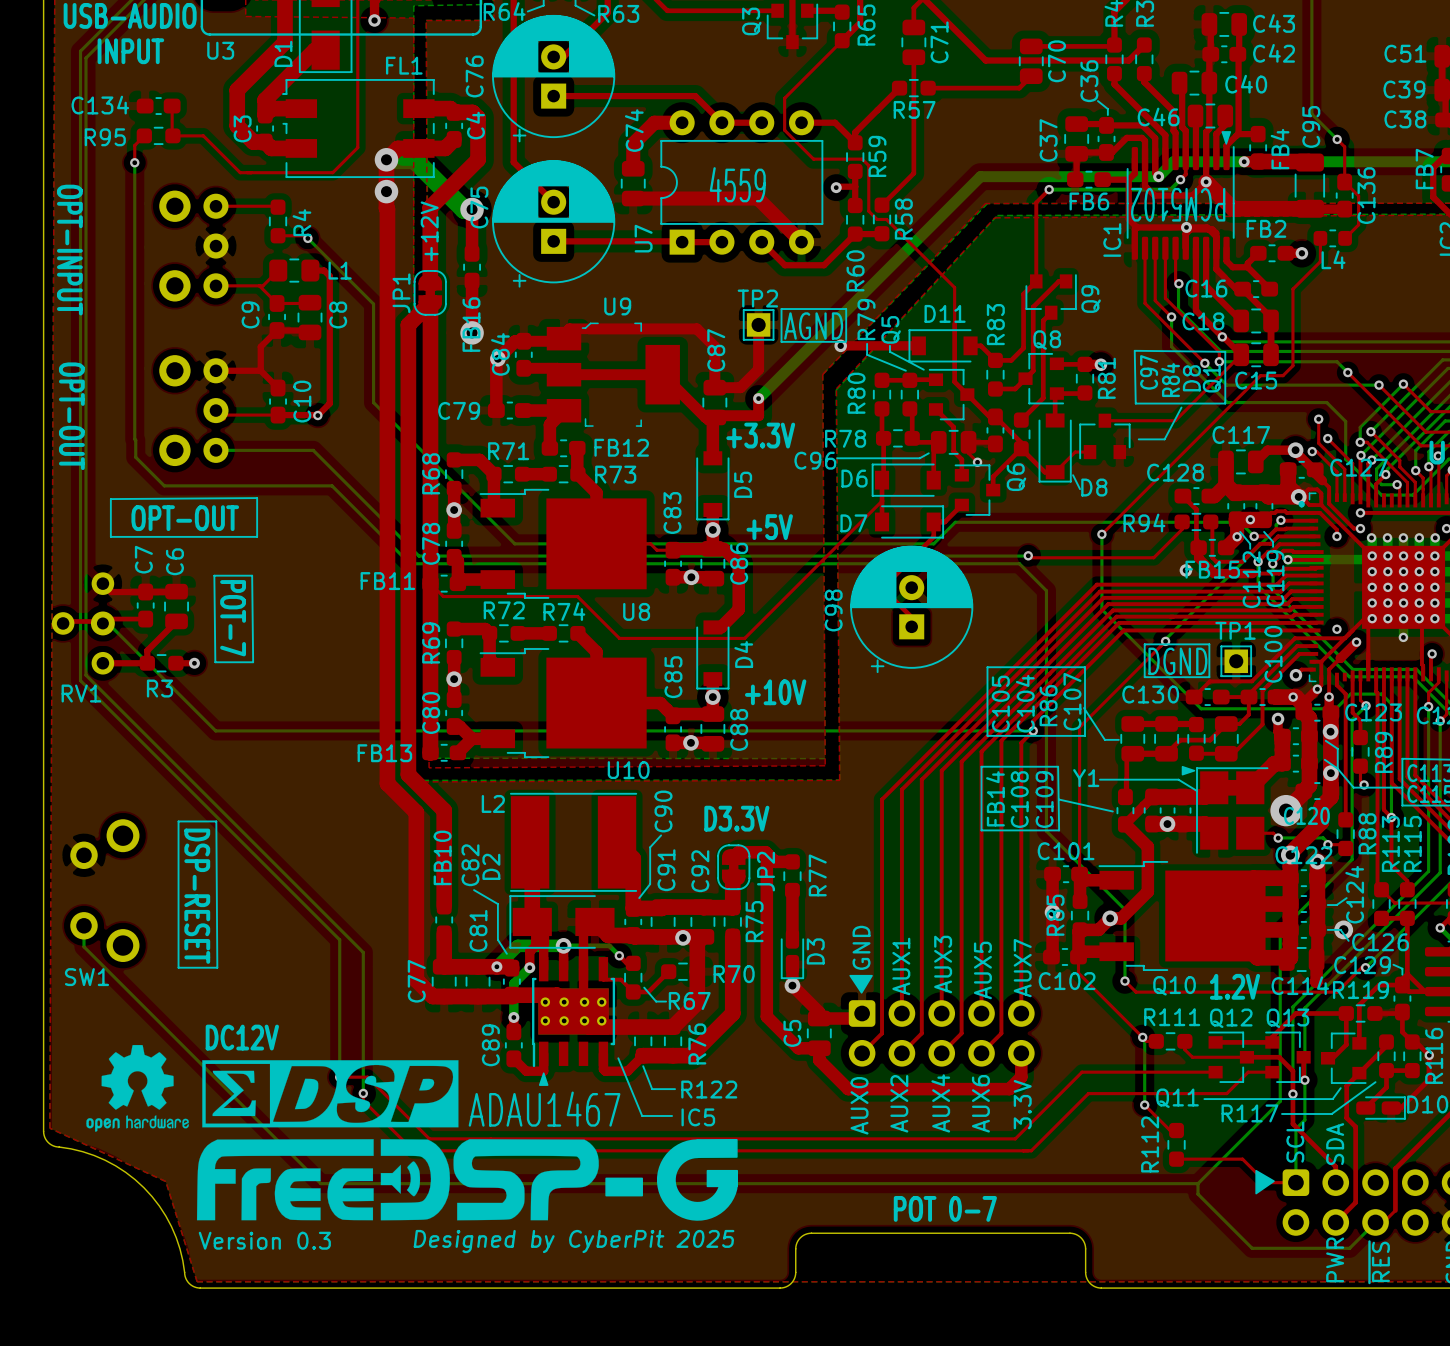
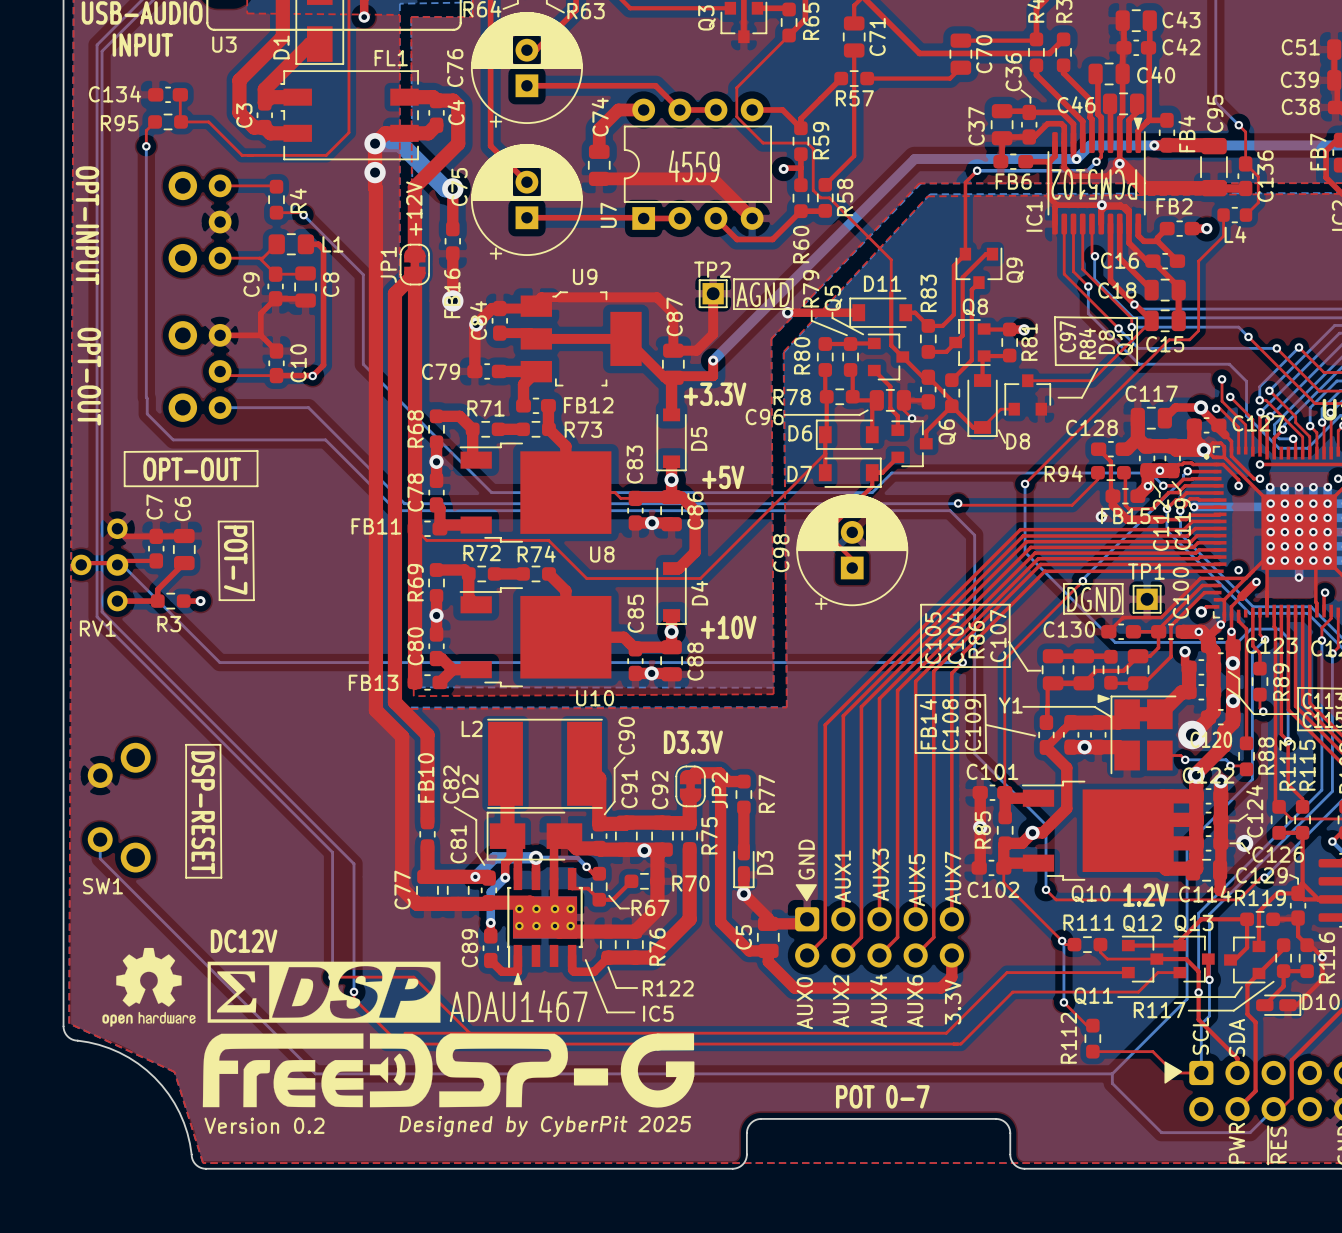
top track: (367, 1077) (429, 1138) -> (357, 977) (413, 977) (469, 1033)
top track: none -> (404, 1033) (414, 1033)
text: Version 0.3 (264, 1240) -> Version 0.2 (264, 1125)

